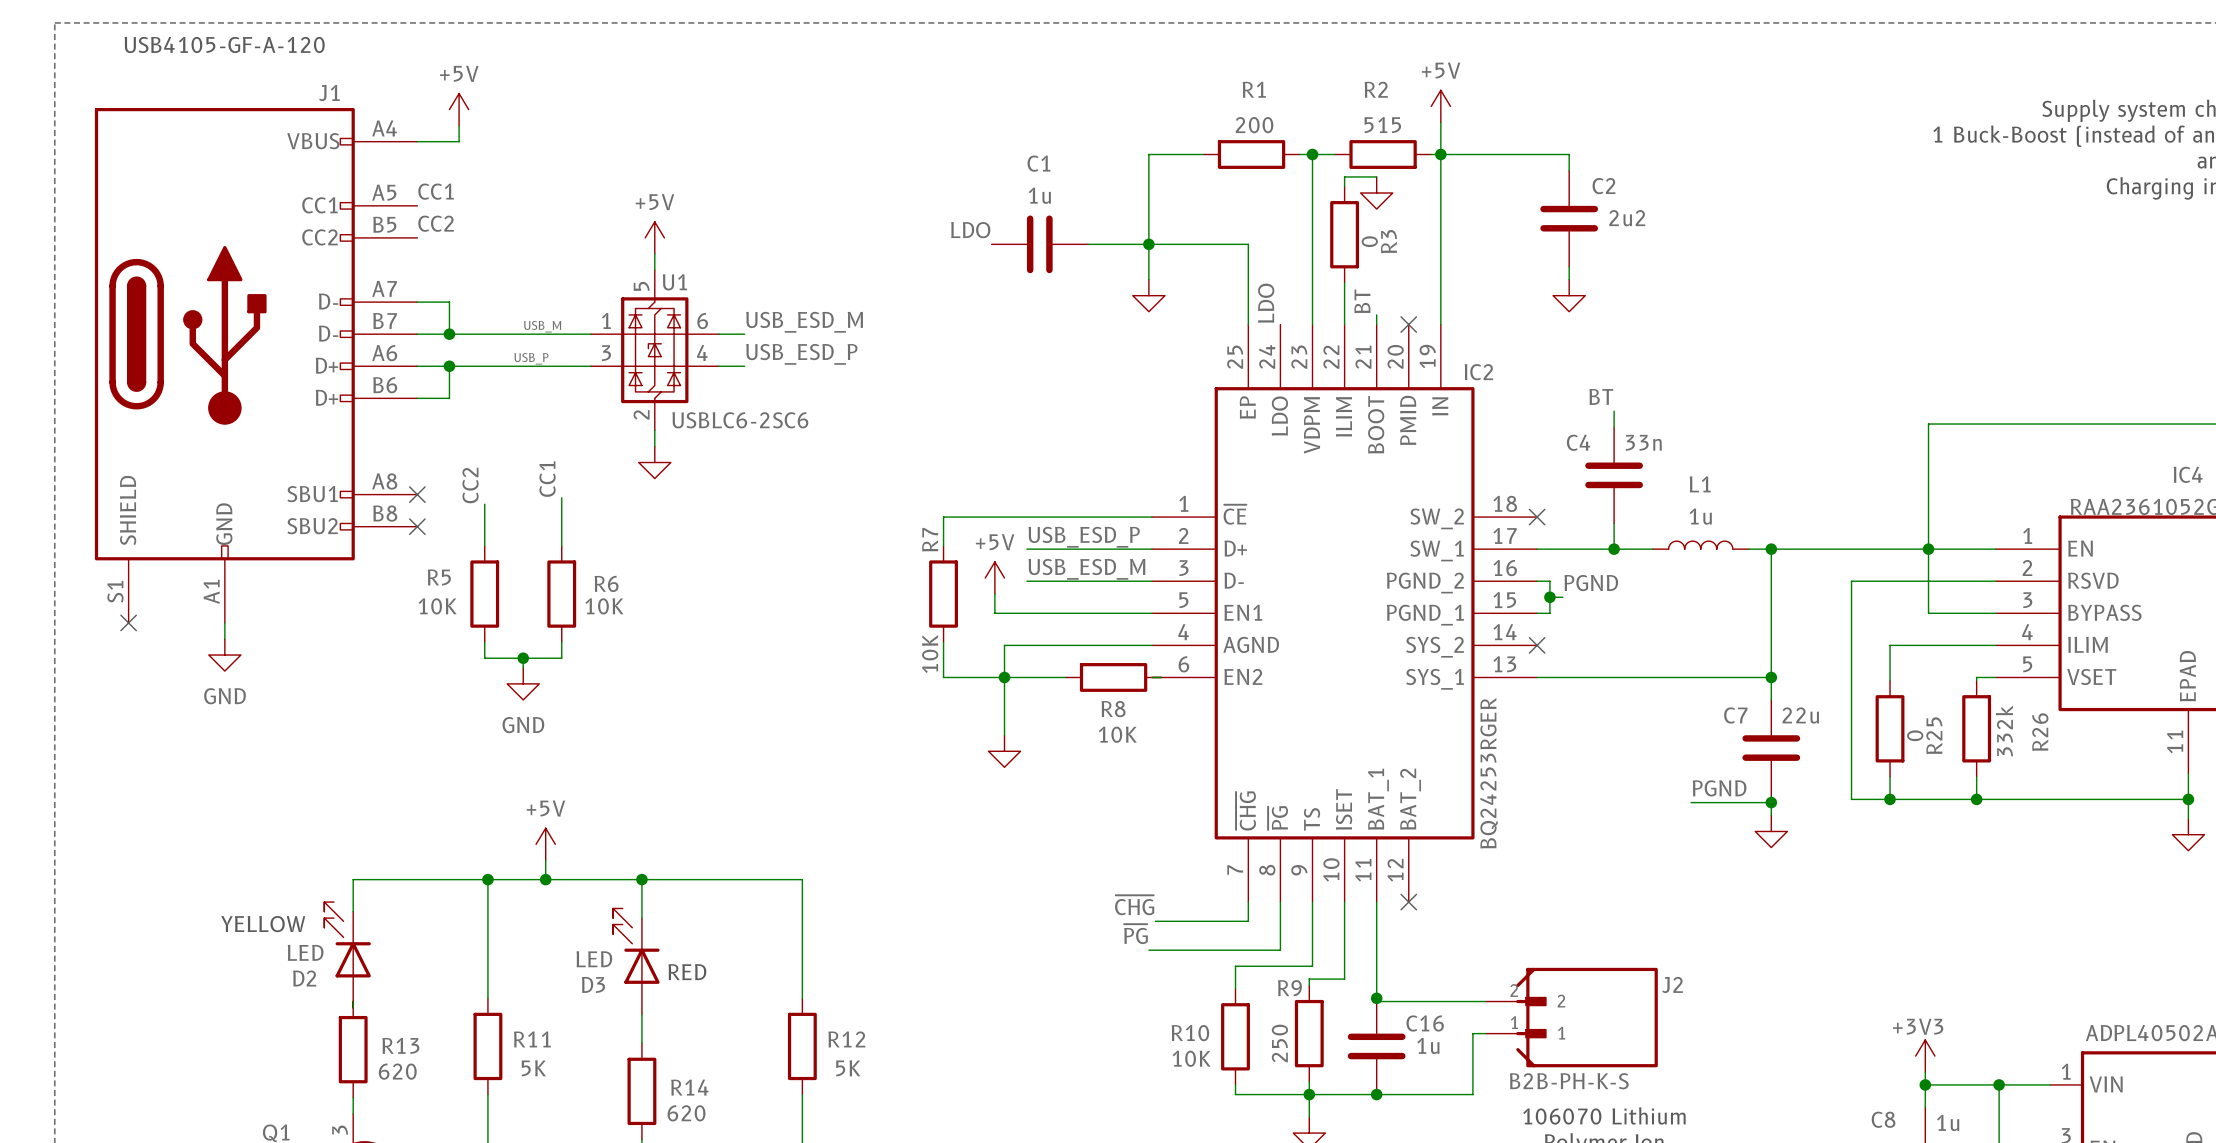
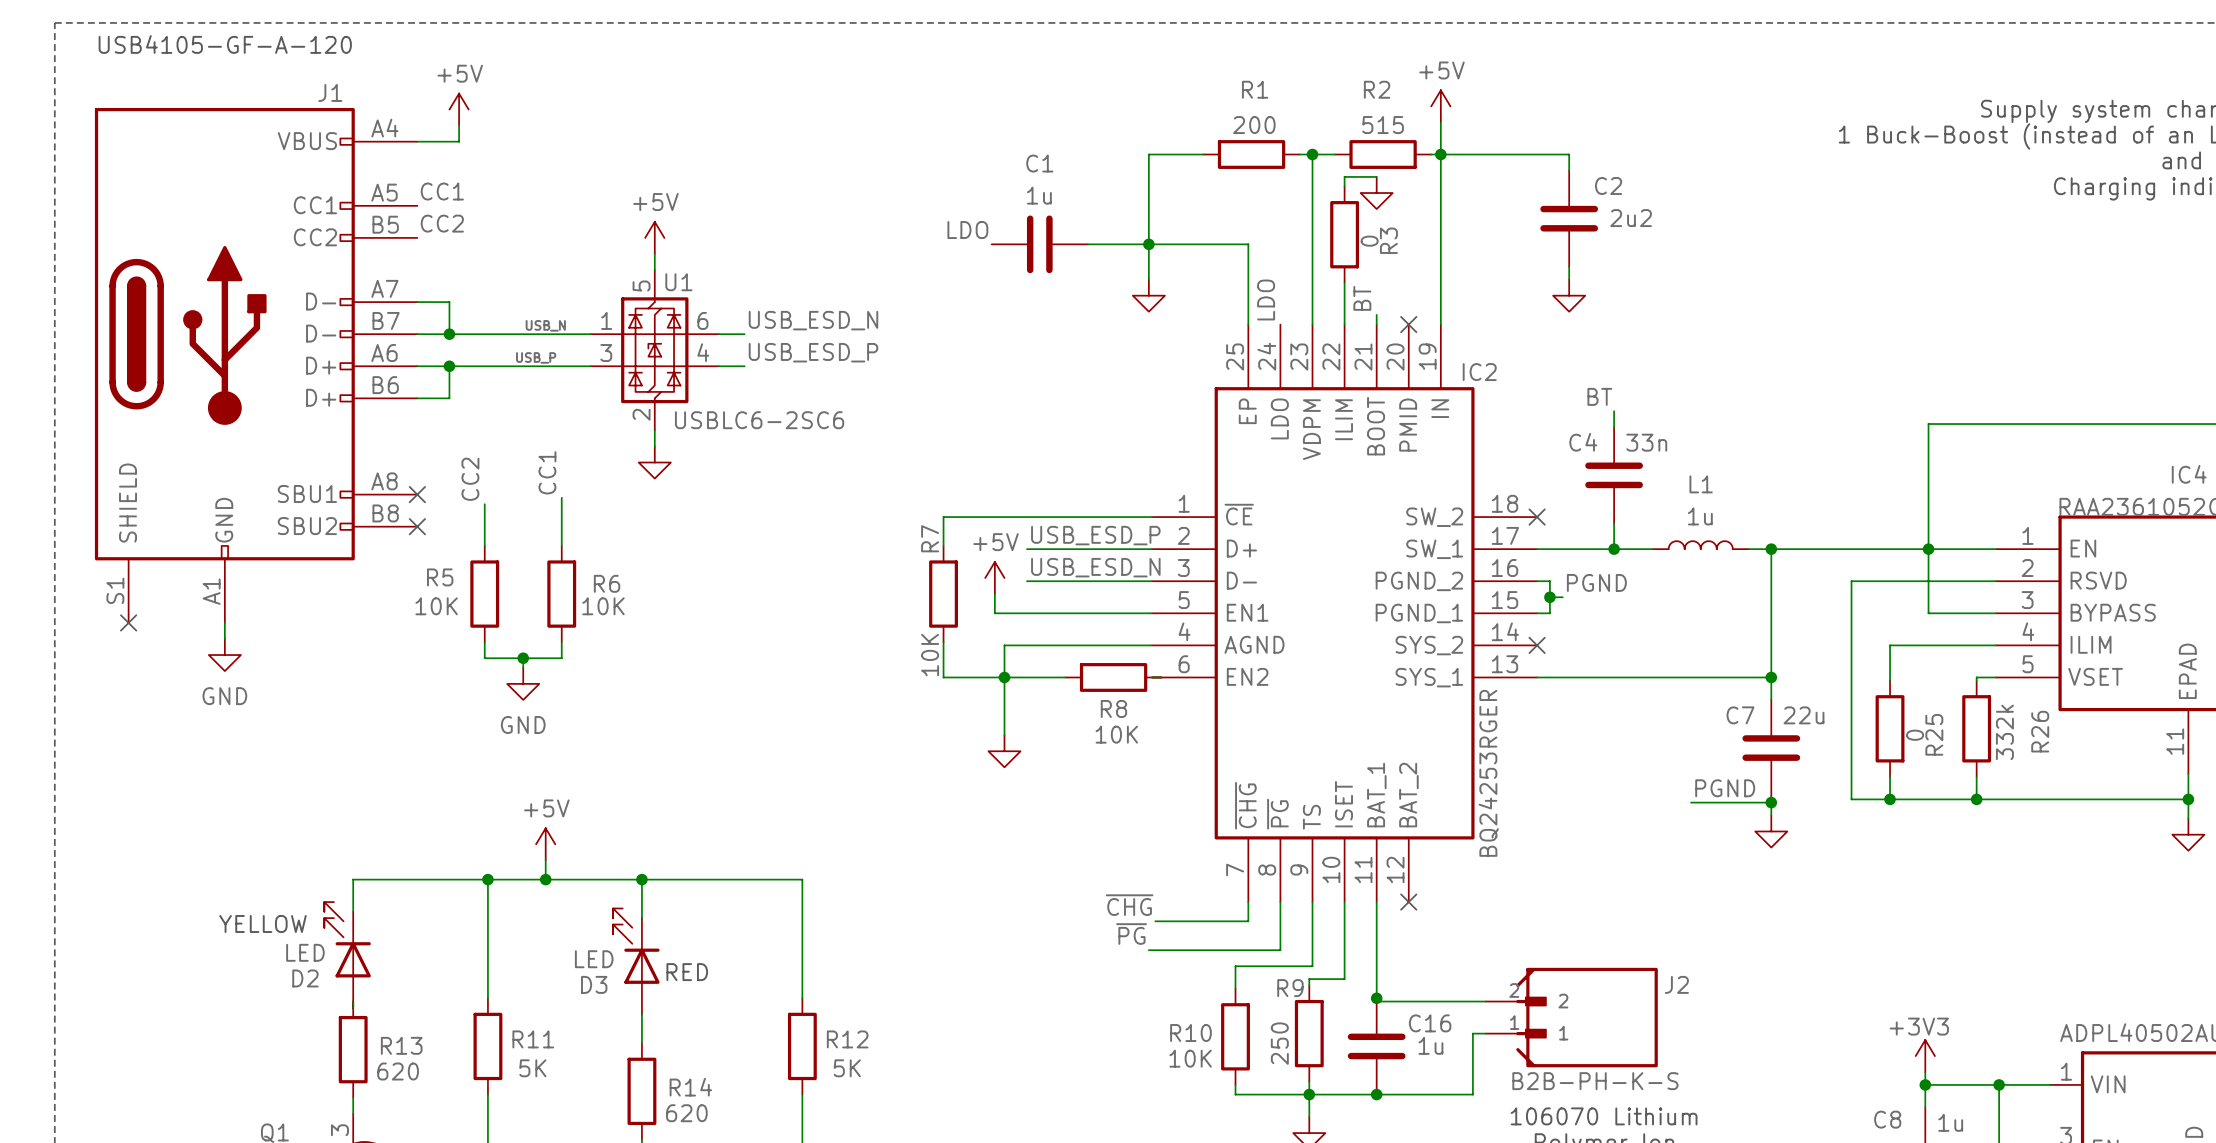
label: USB_ESD_M (804, 322) -> USB_ESD_N (813, 320)
label: USB_M (542, 326) -> USB_N (545, 325)
label: USB_ESD_M (1086, 569) -> USB_ESD_N (1095, 567)

